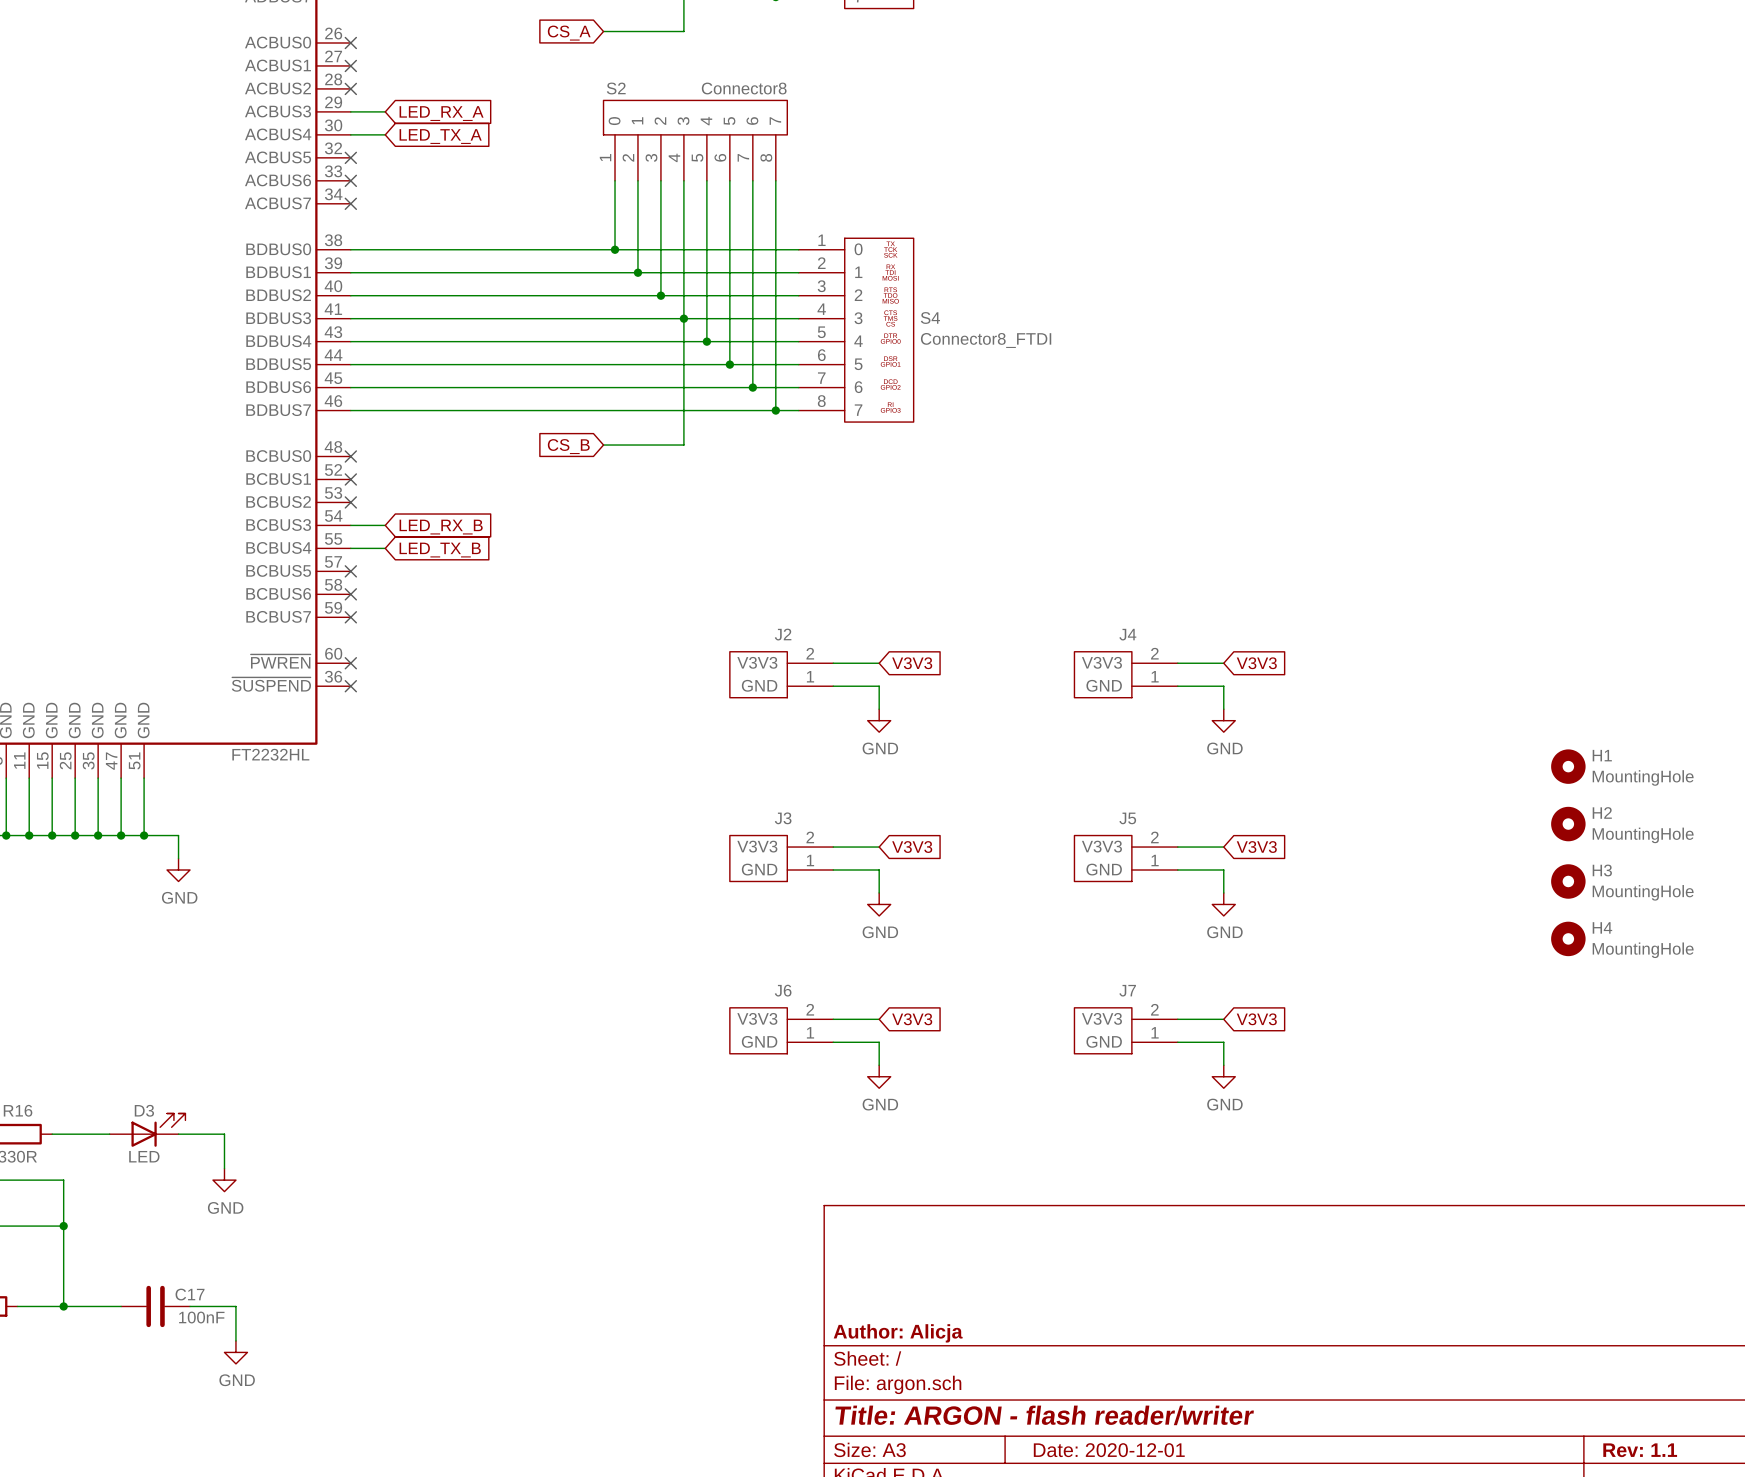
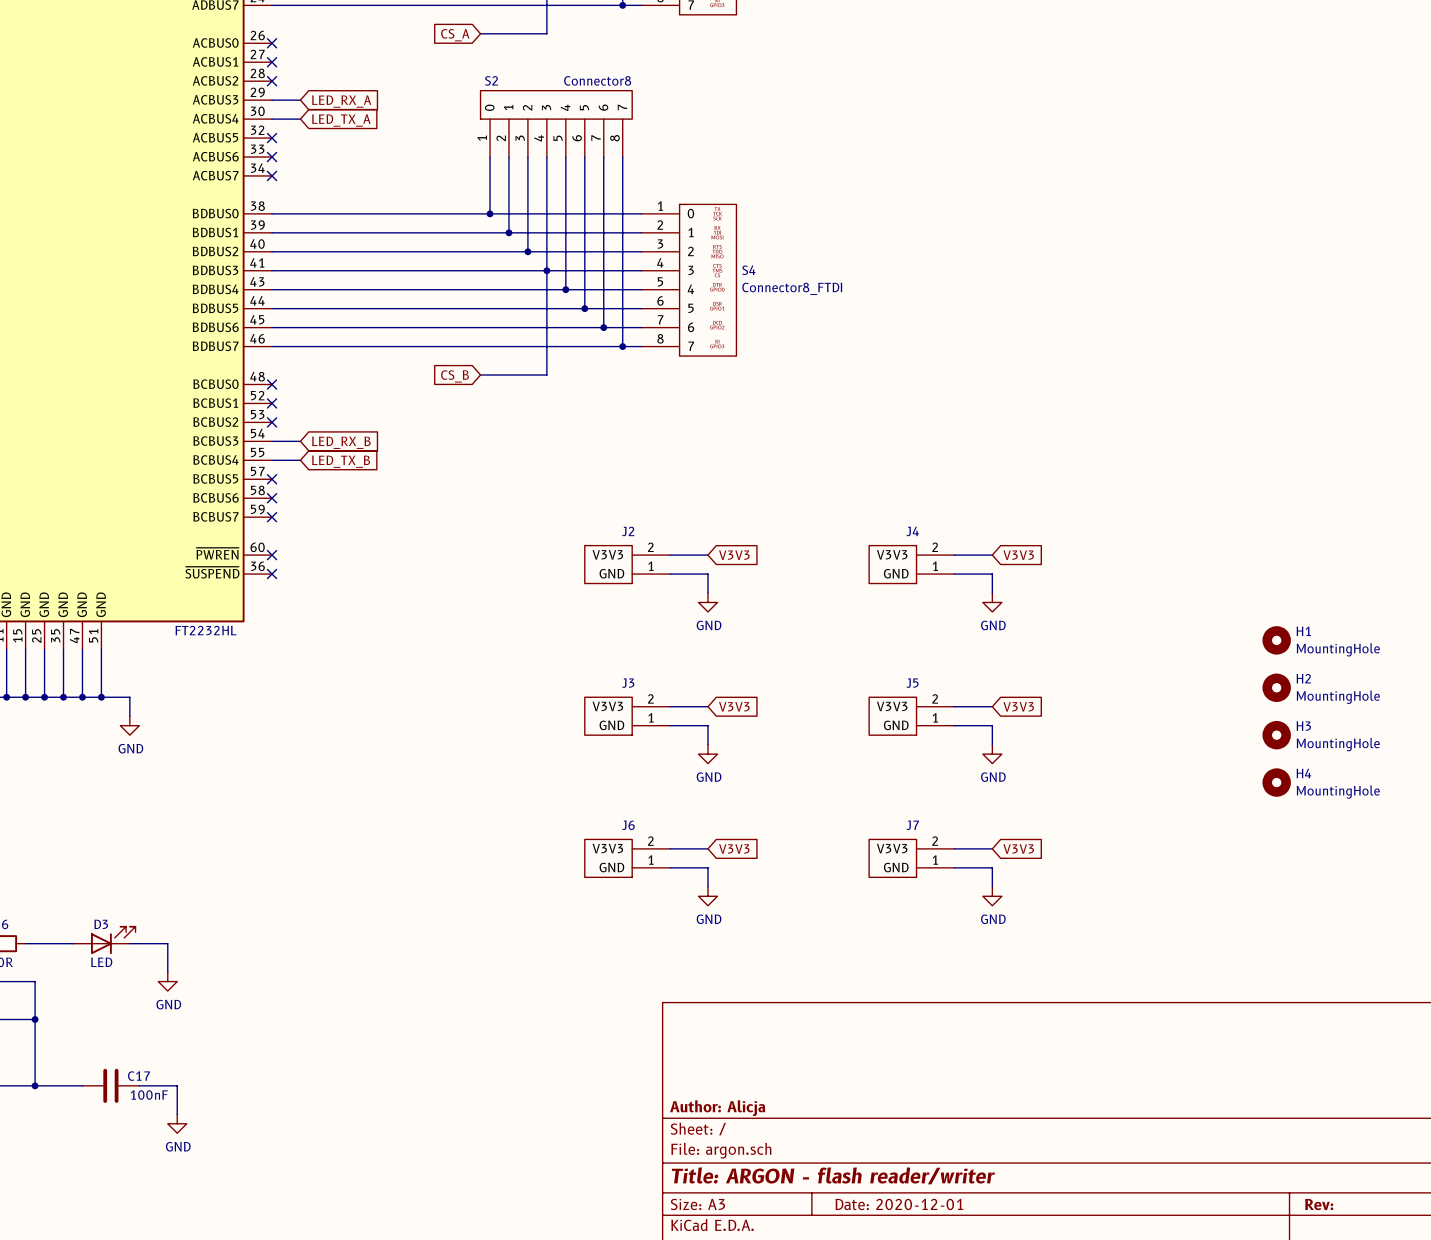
title block: Rev: 1.1 (1640, 1450) -> Rev: (1319, 1204)

